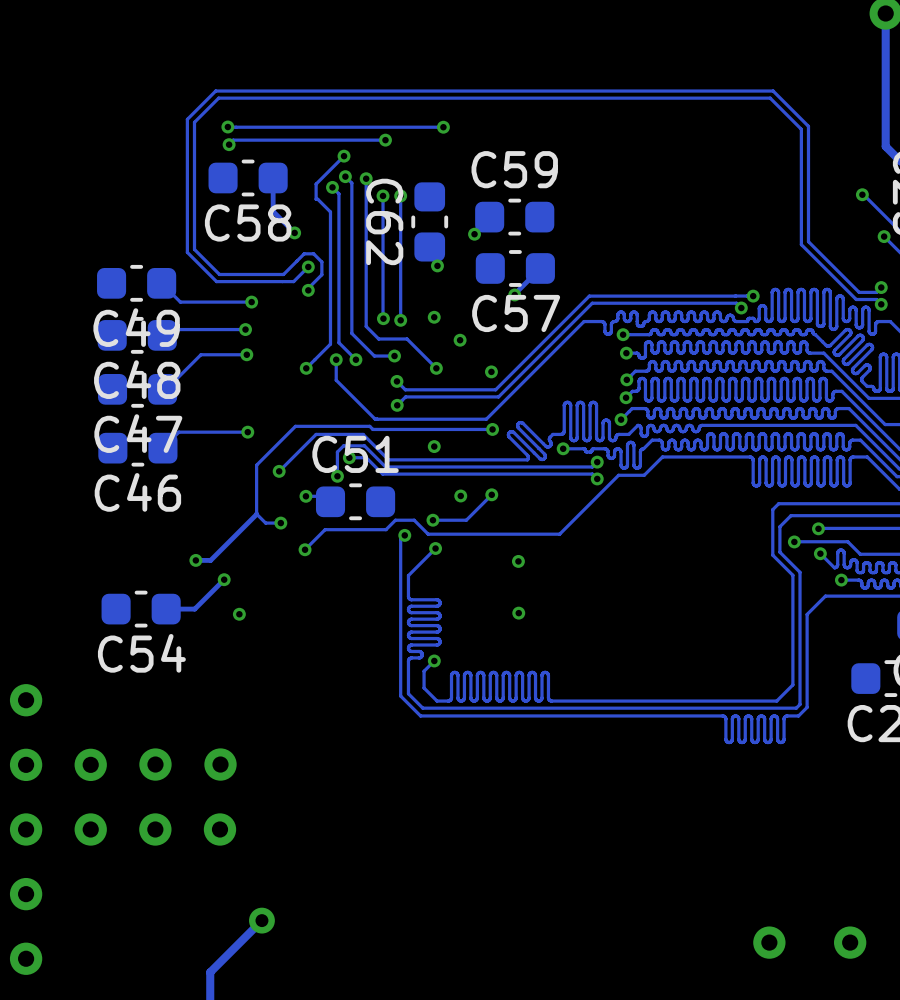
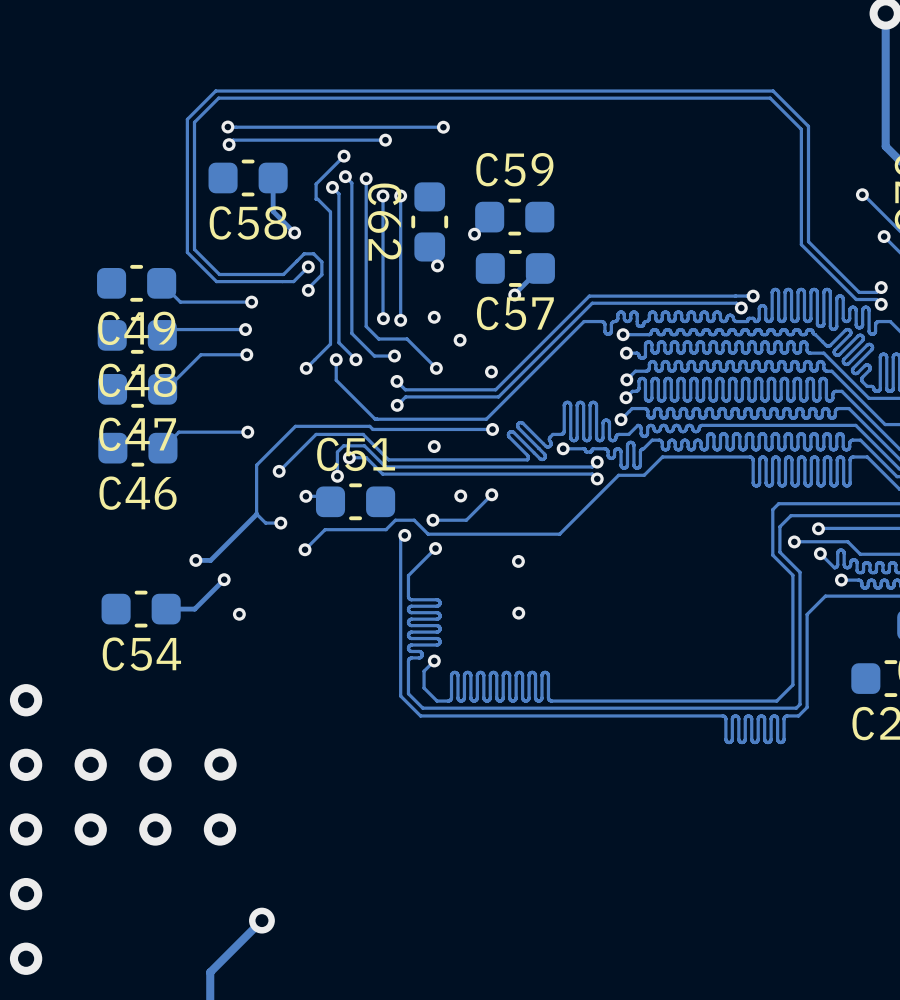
via: (769, 942) -> none
via: (850, 942) -> none

